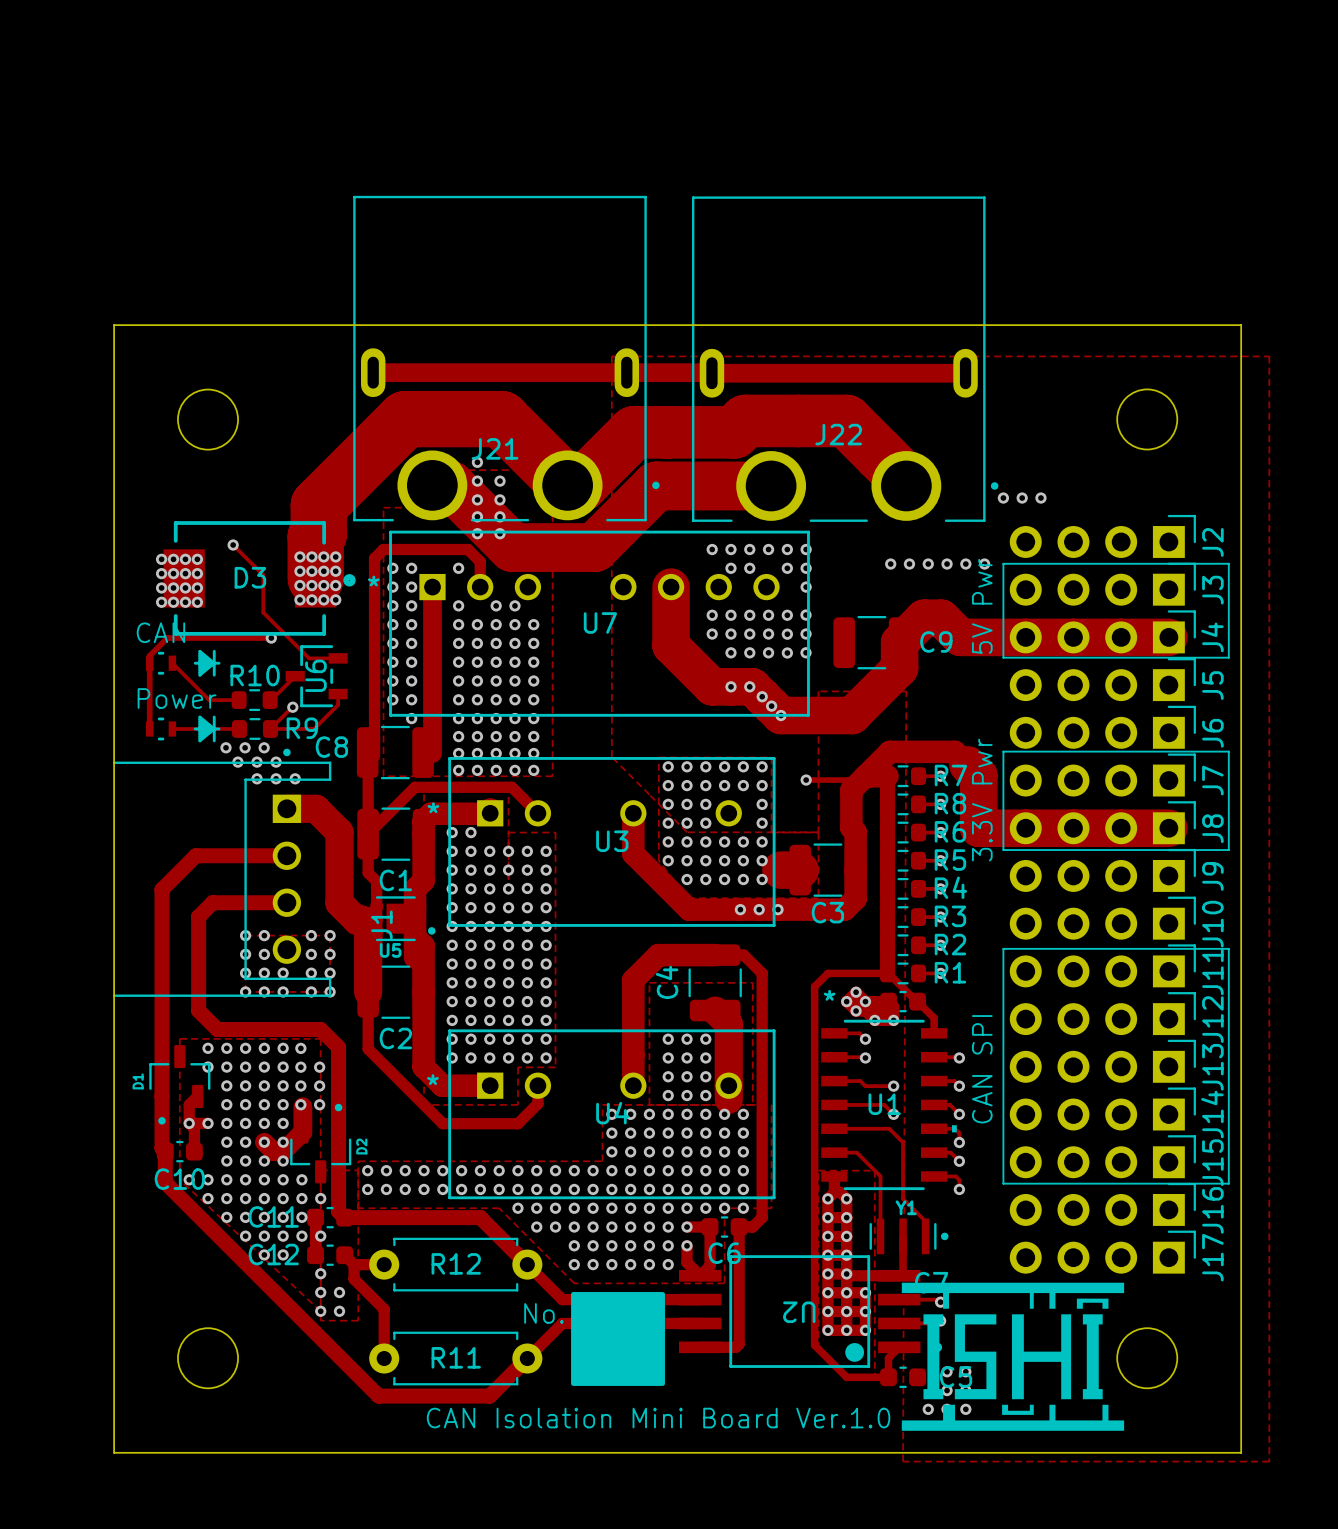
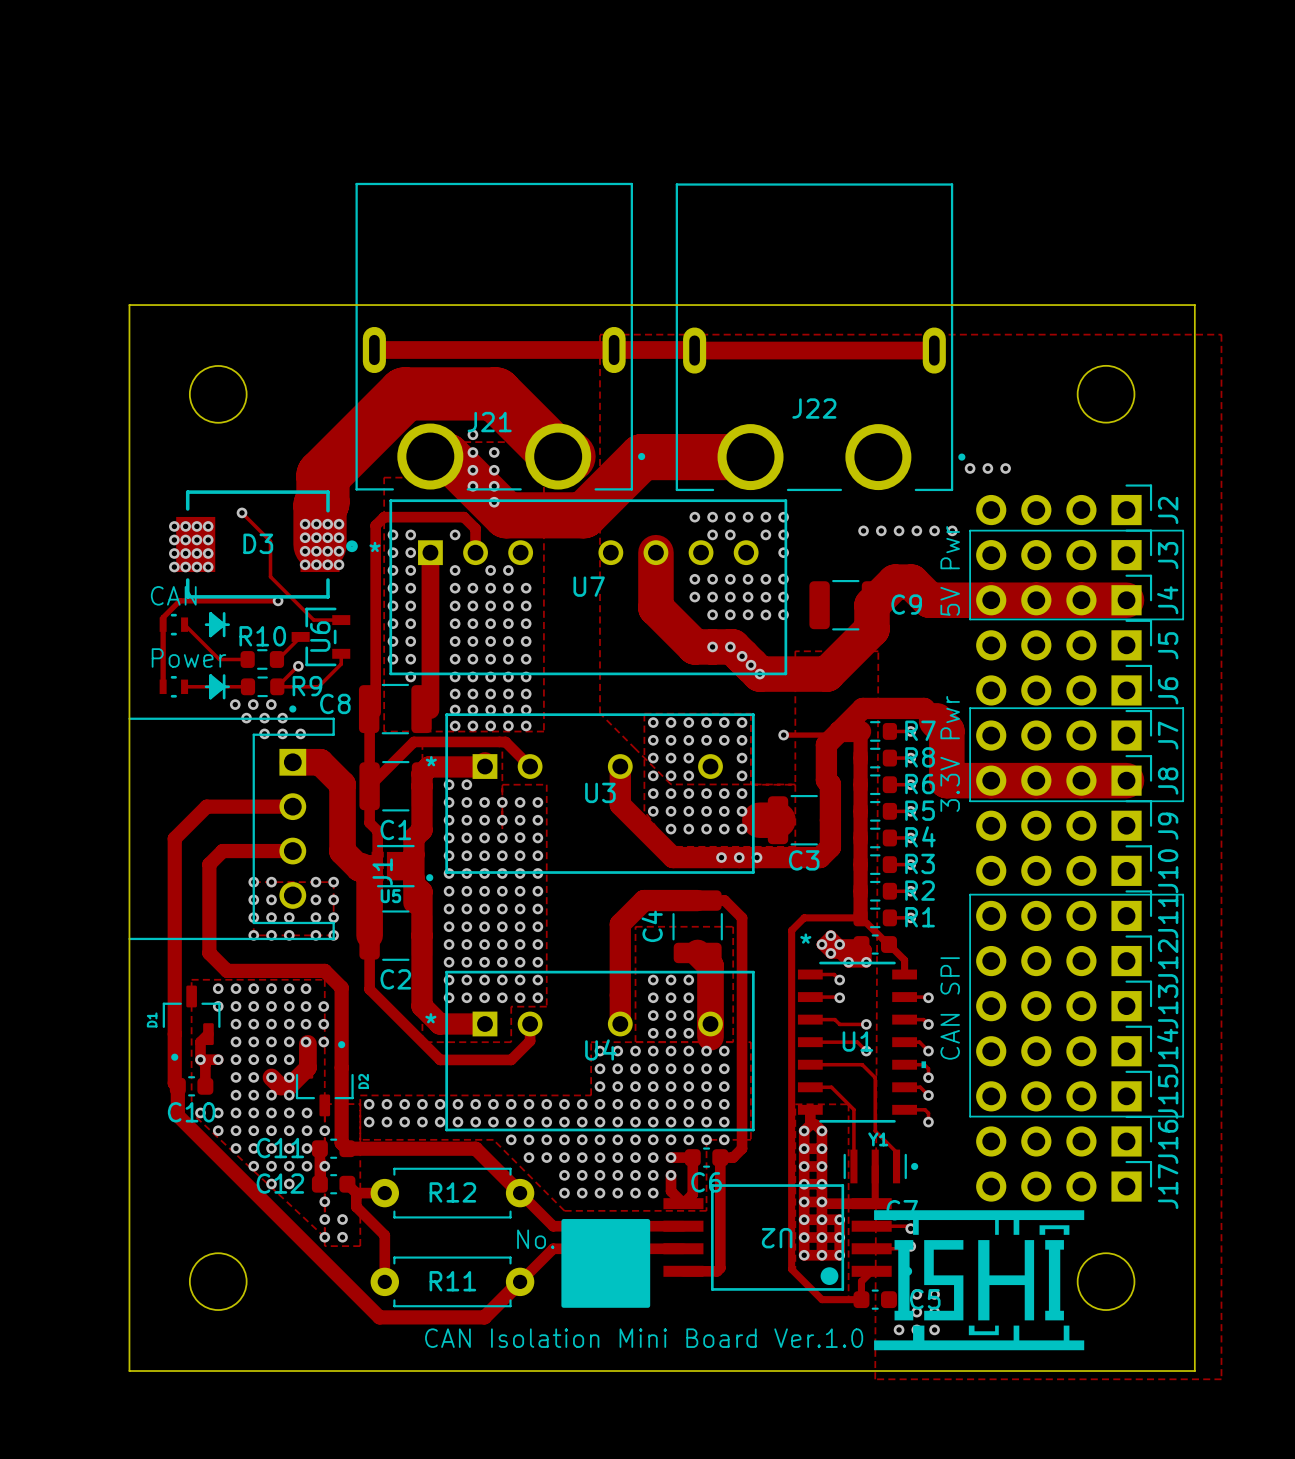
track: (906, 481) (846, 420) (745, 420) (734, 432) (634, 432) (581, 485) -> none
via: (477, 533) -> none

